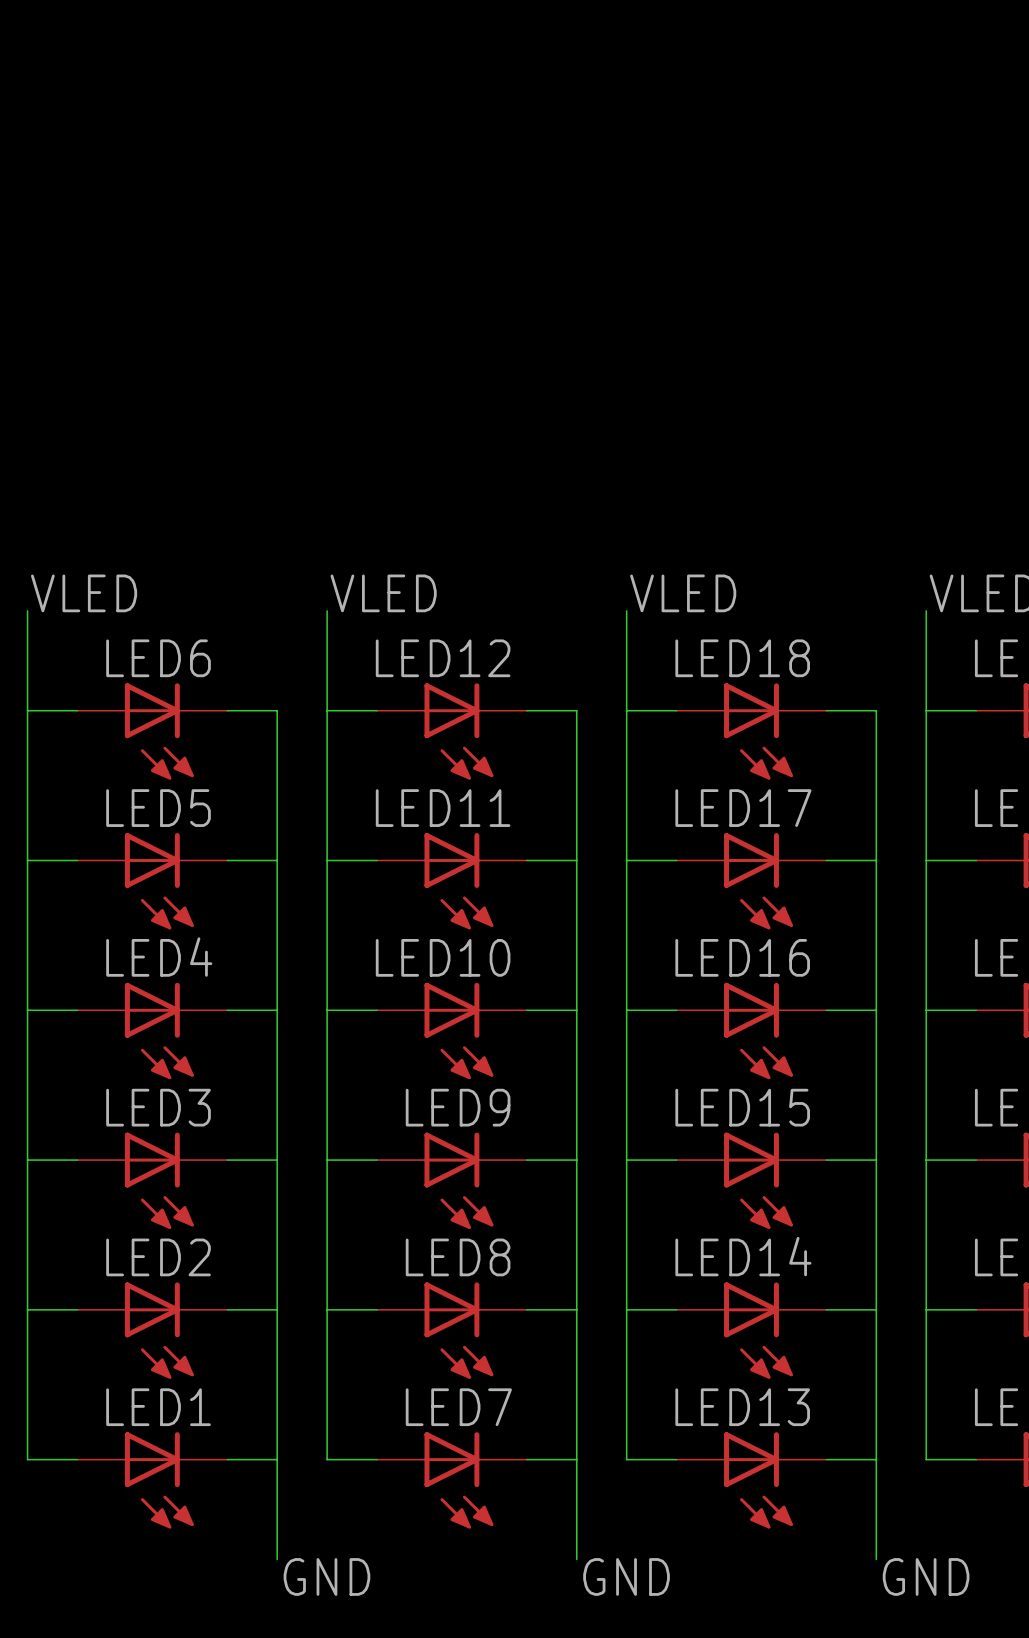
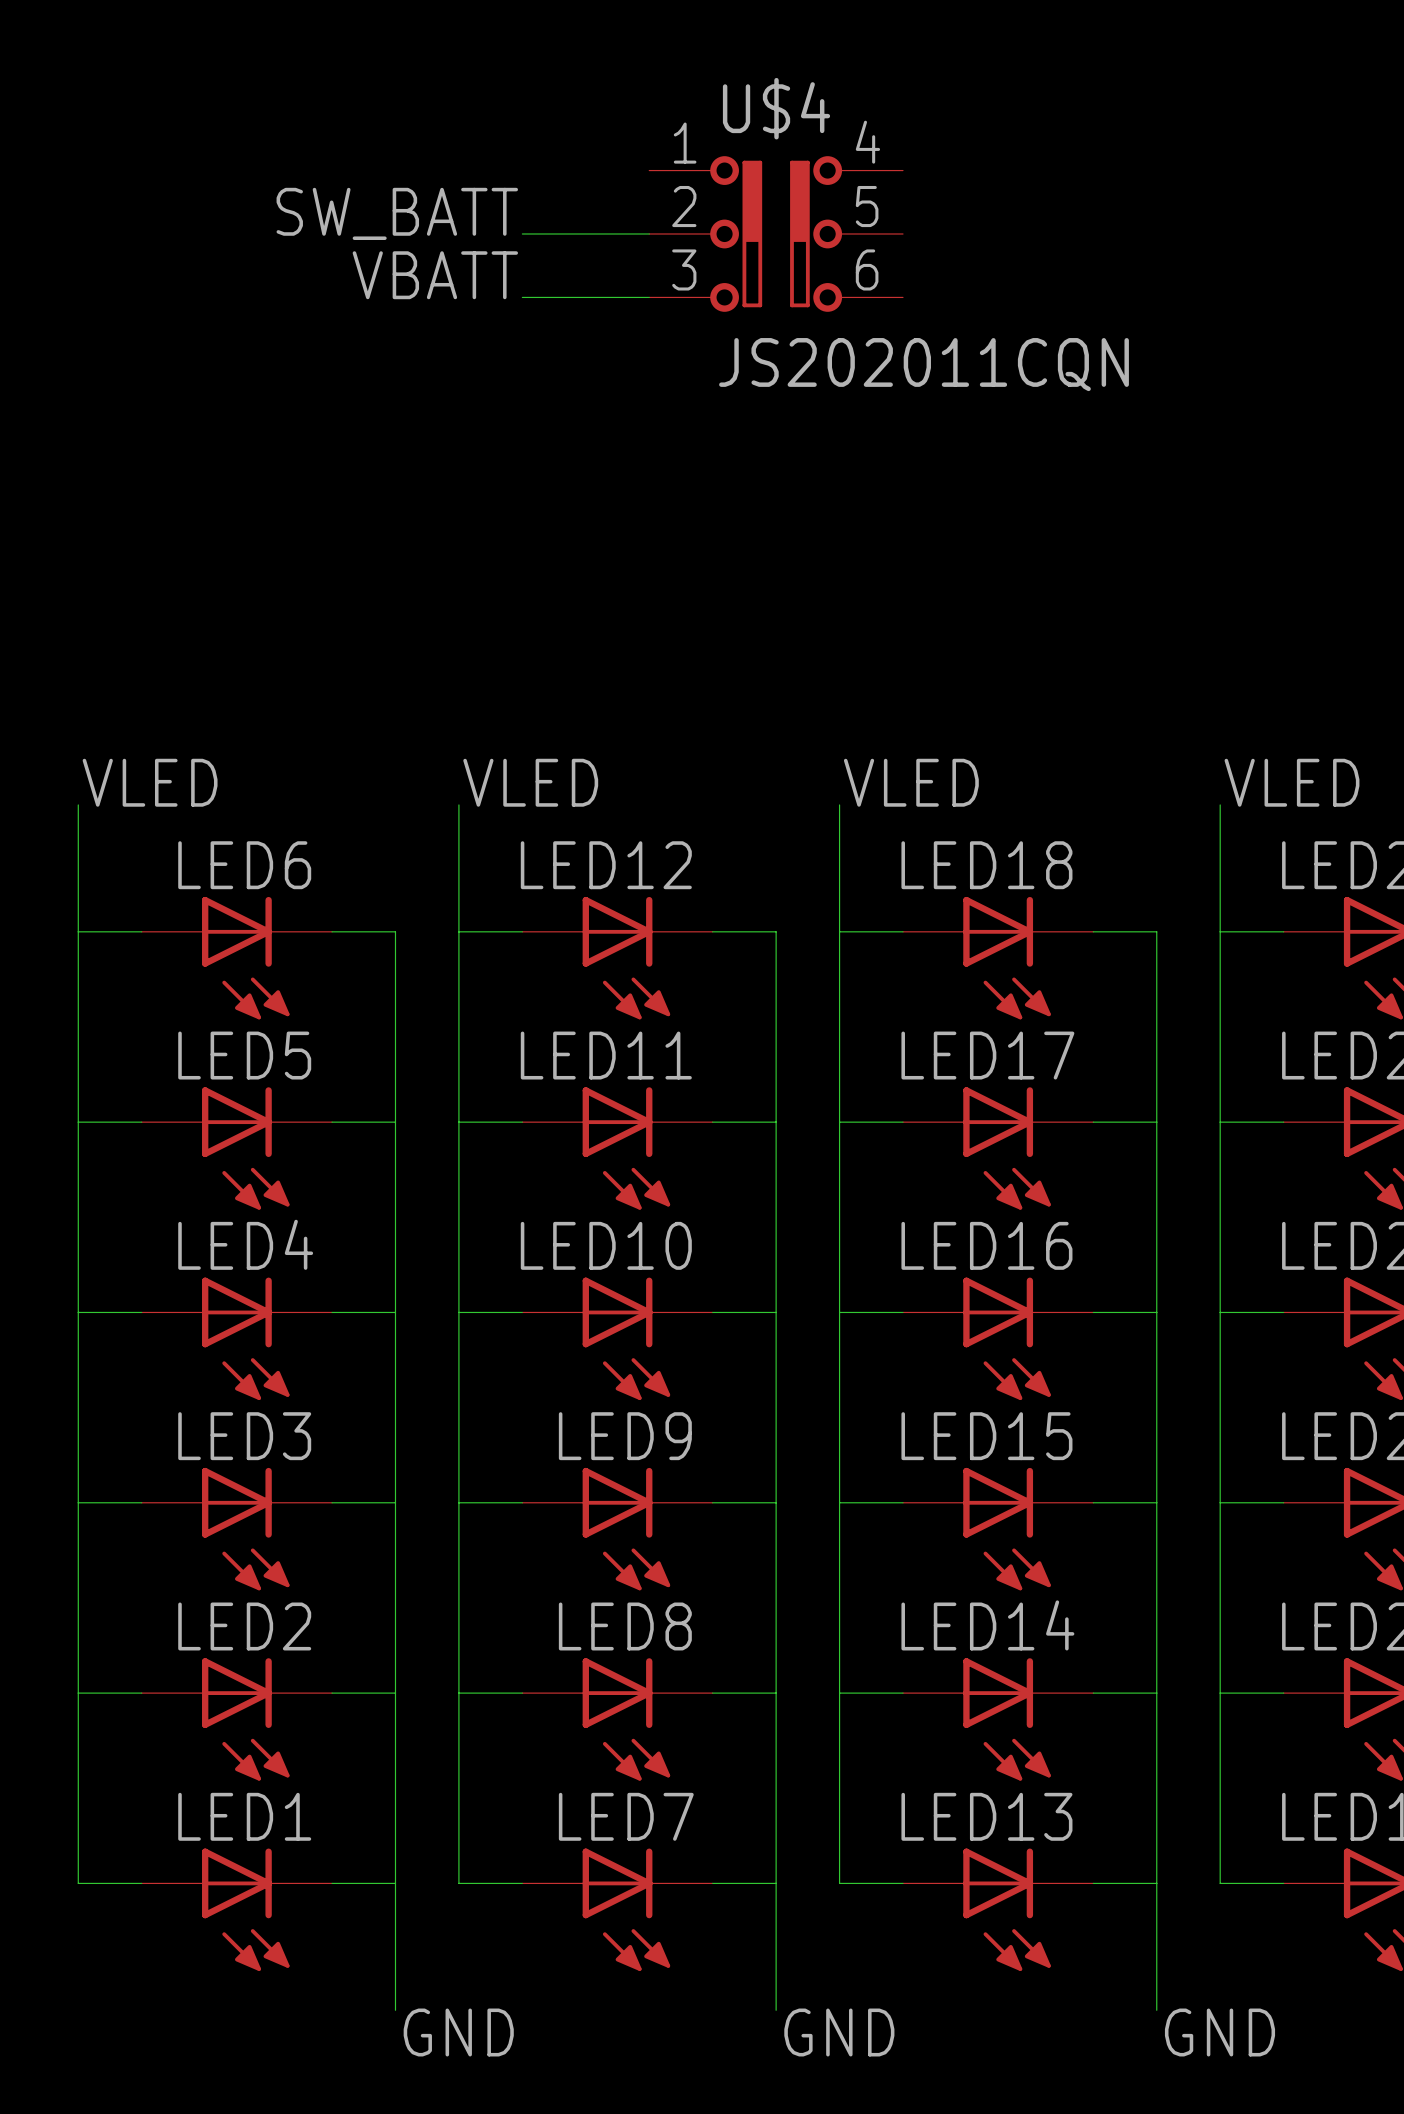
label: none -> SW_BATT (397, 213)
wire: none -> (522, 233) (649, 233)
U$4: none -> JS202011CQN (776, 233)
label: none -> VBATT (435, 275)
wire: none -> (522, 297) (649, 297)

